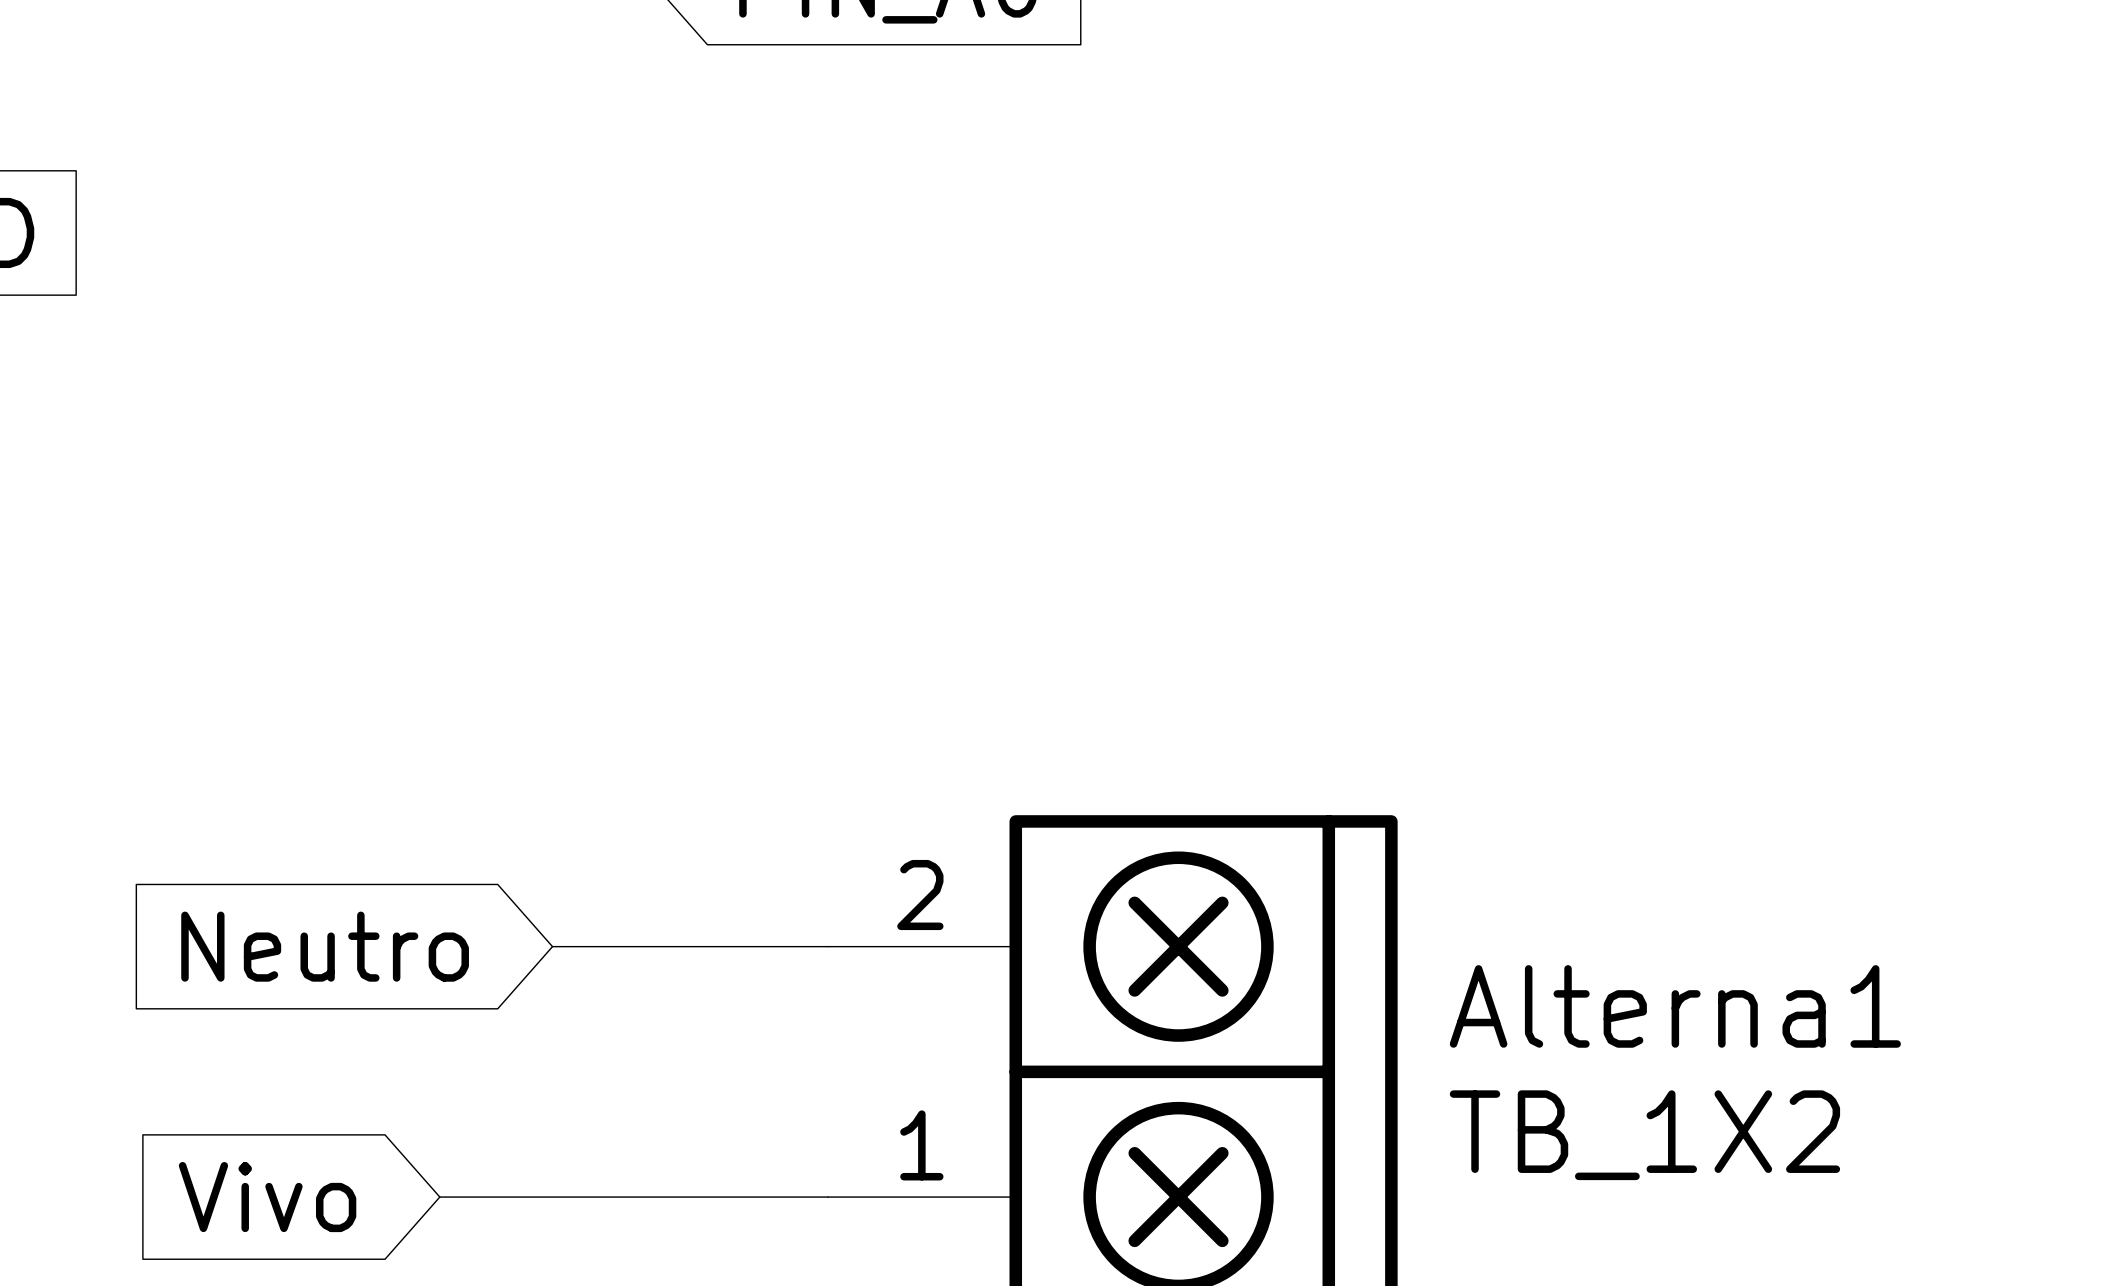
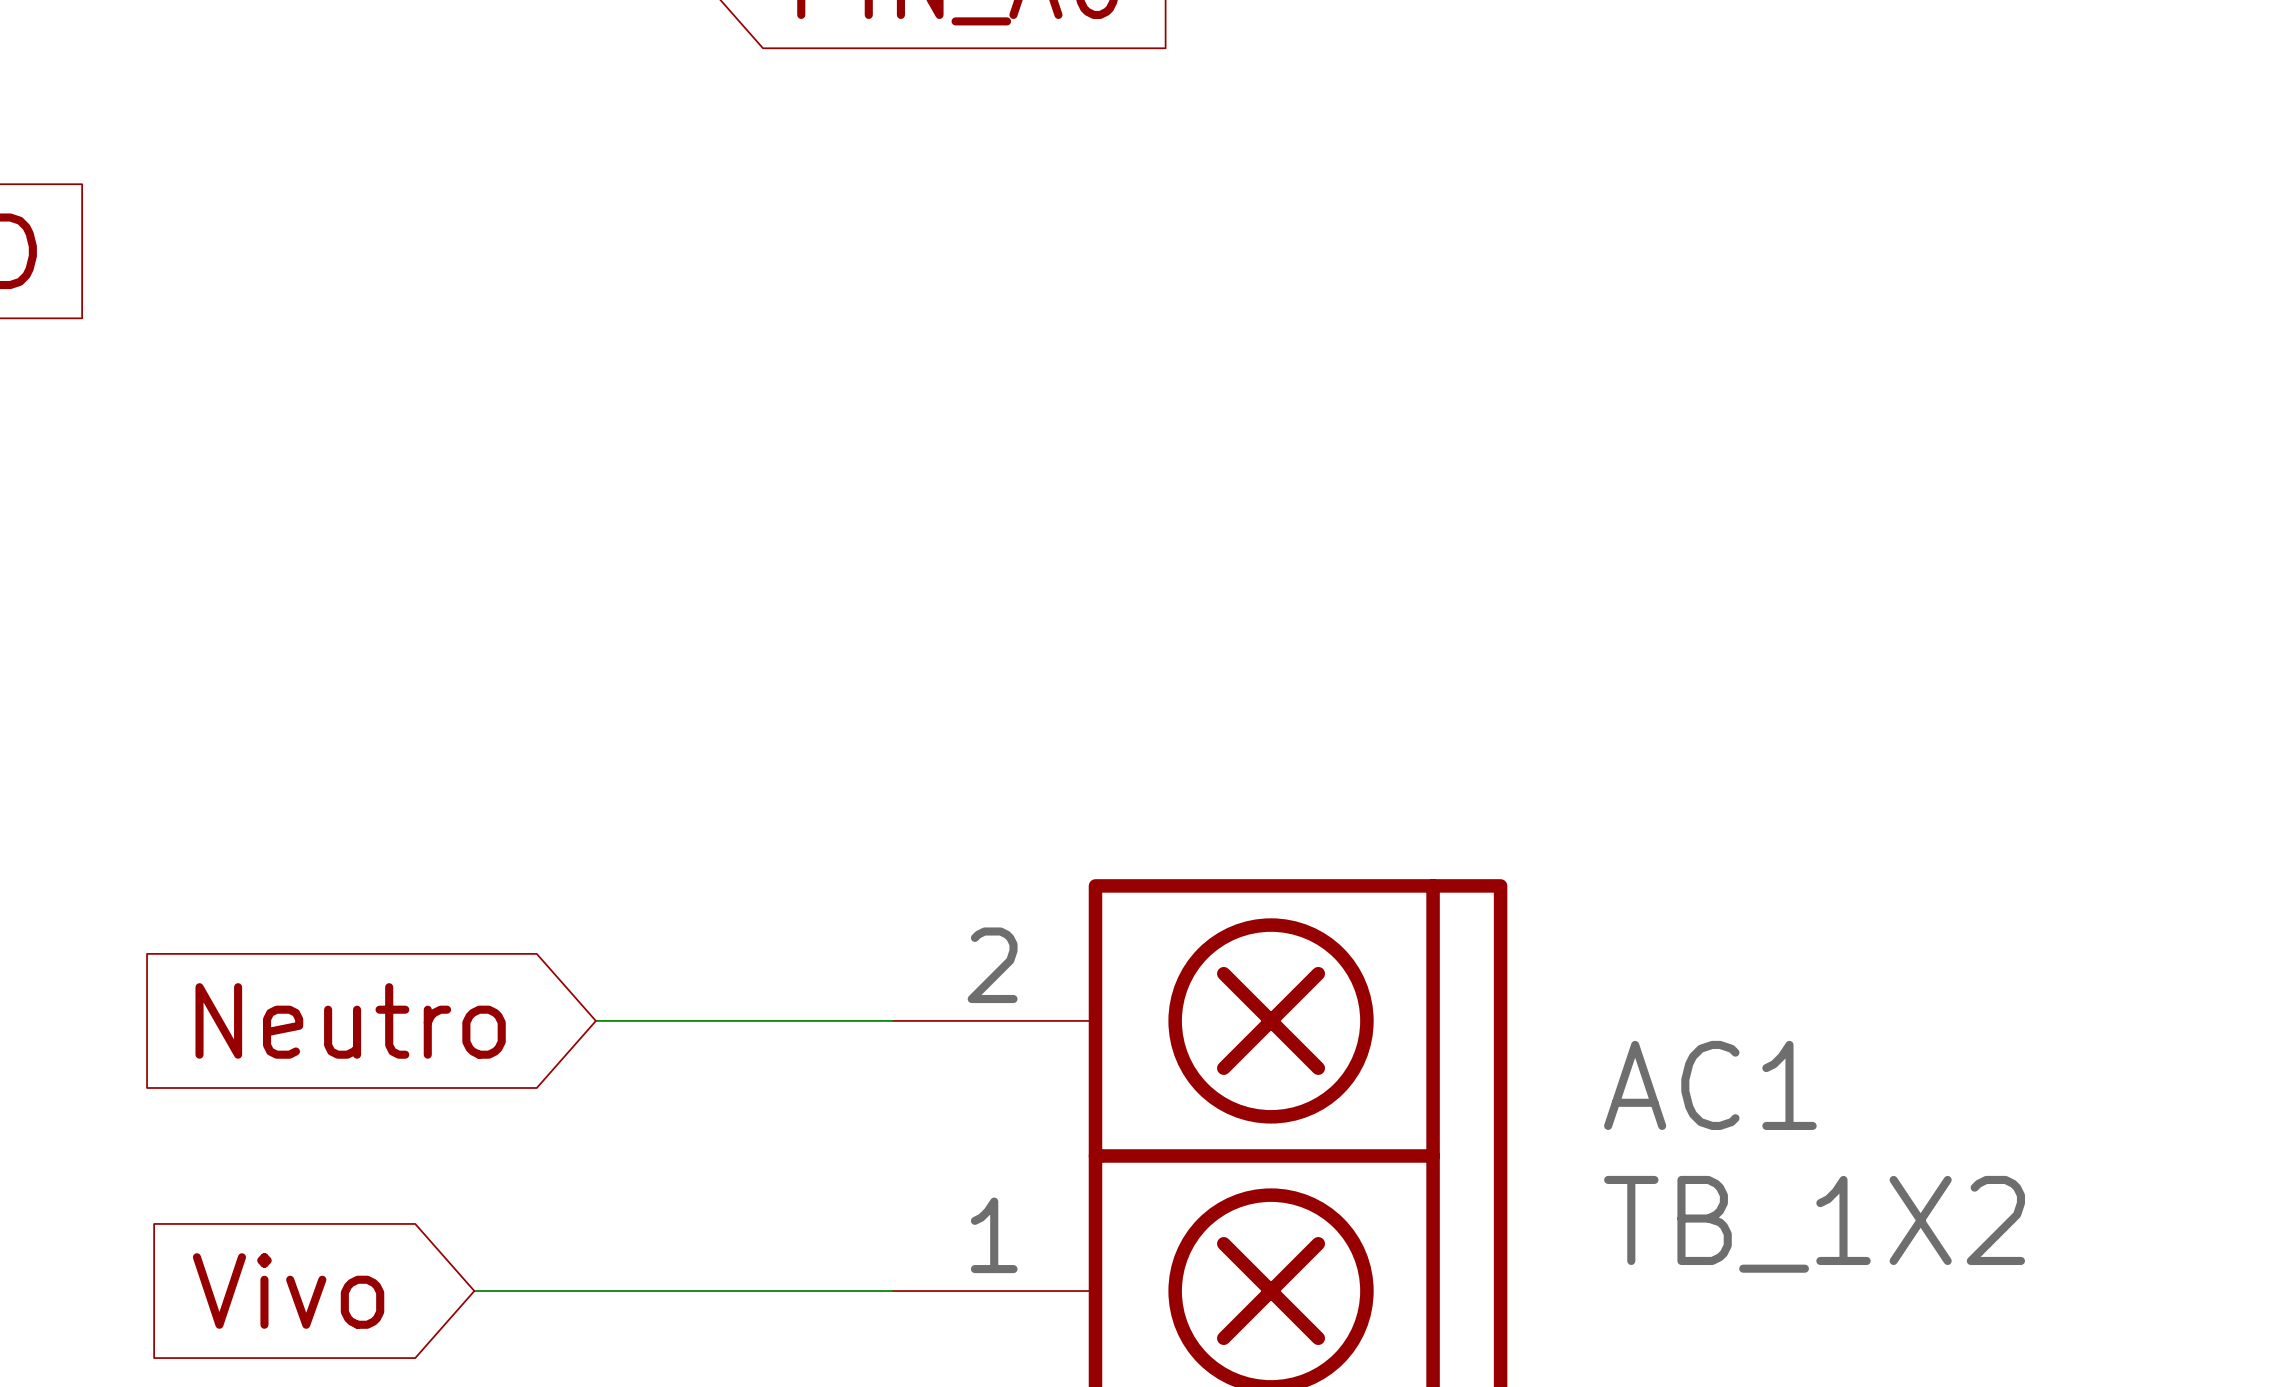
Alterna1 name: Alterna1 (1675, 1006) -> AC1 (1710, 1085)
Alterna1 value position: TB_1X2 (1644, 1135) -> TB_1X2 (1814, 1224)

